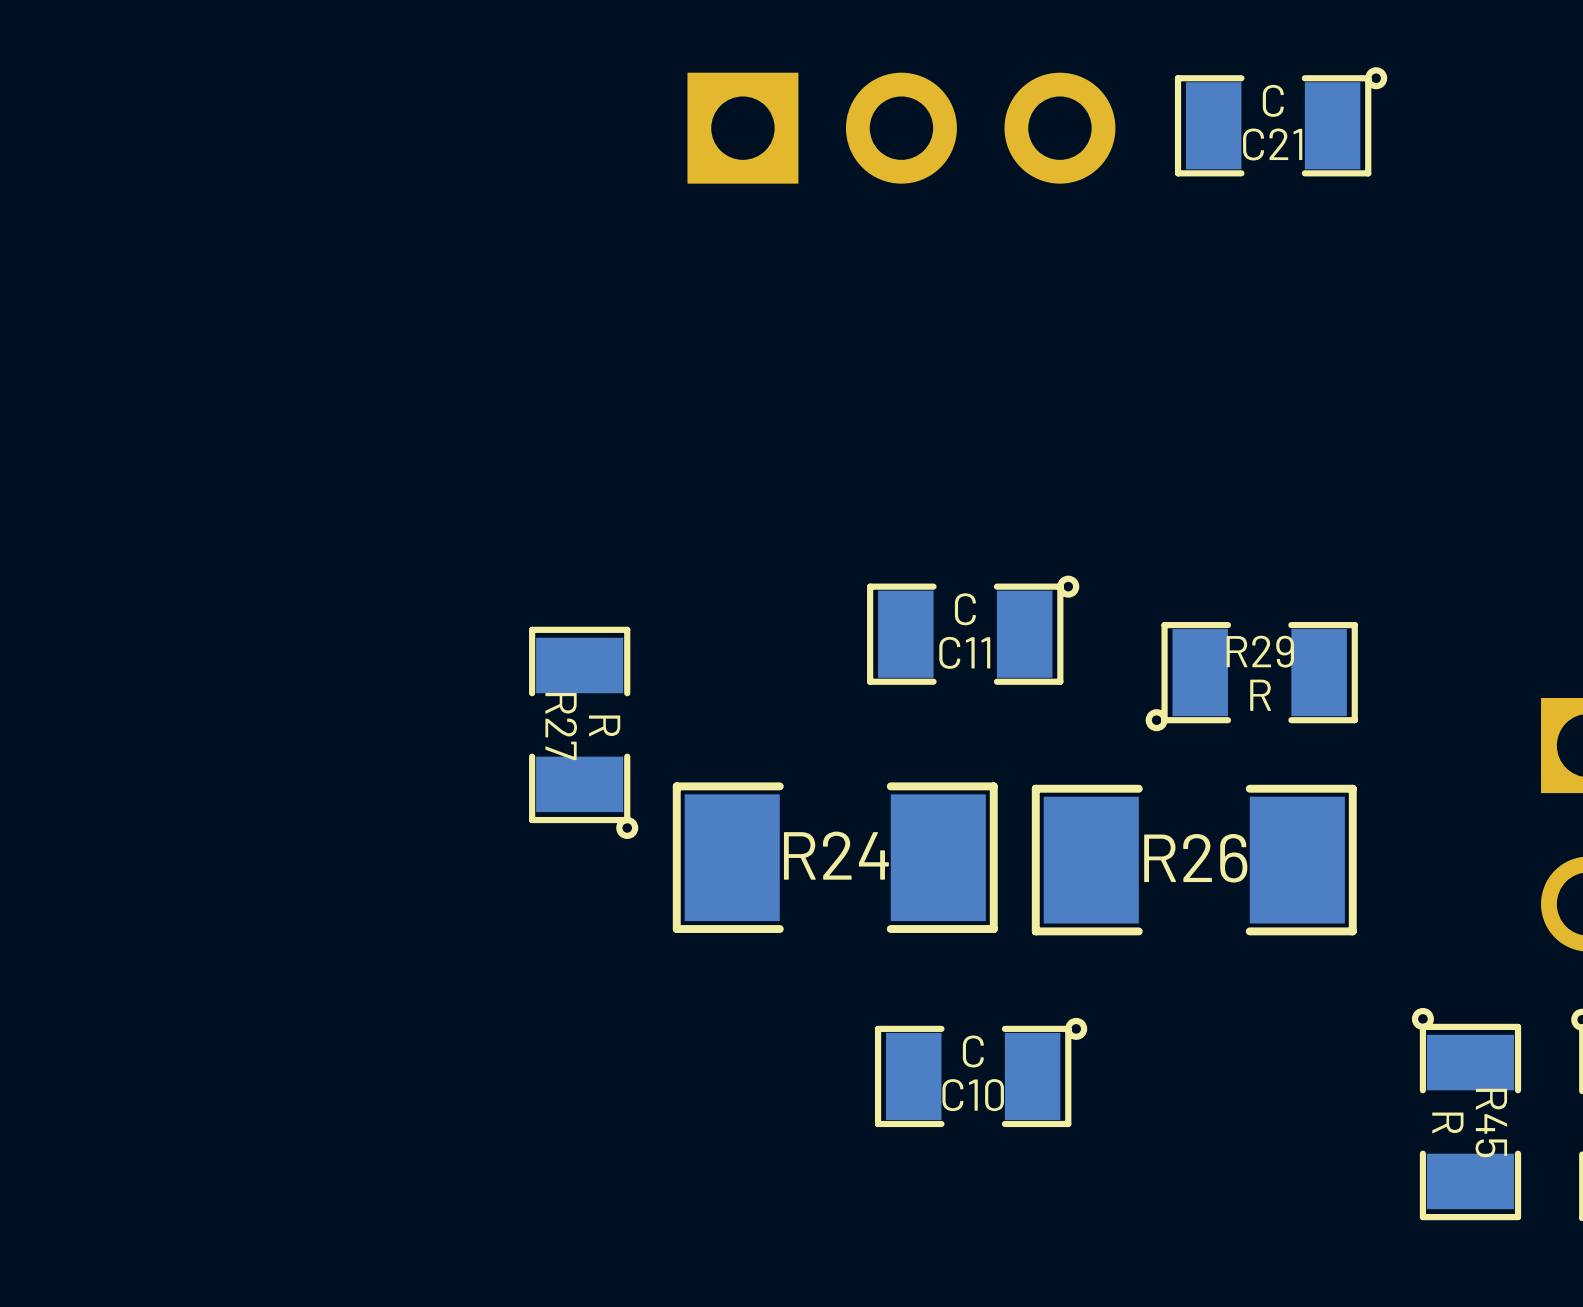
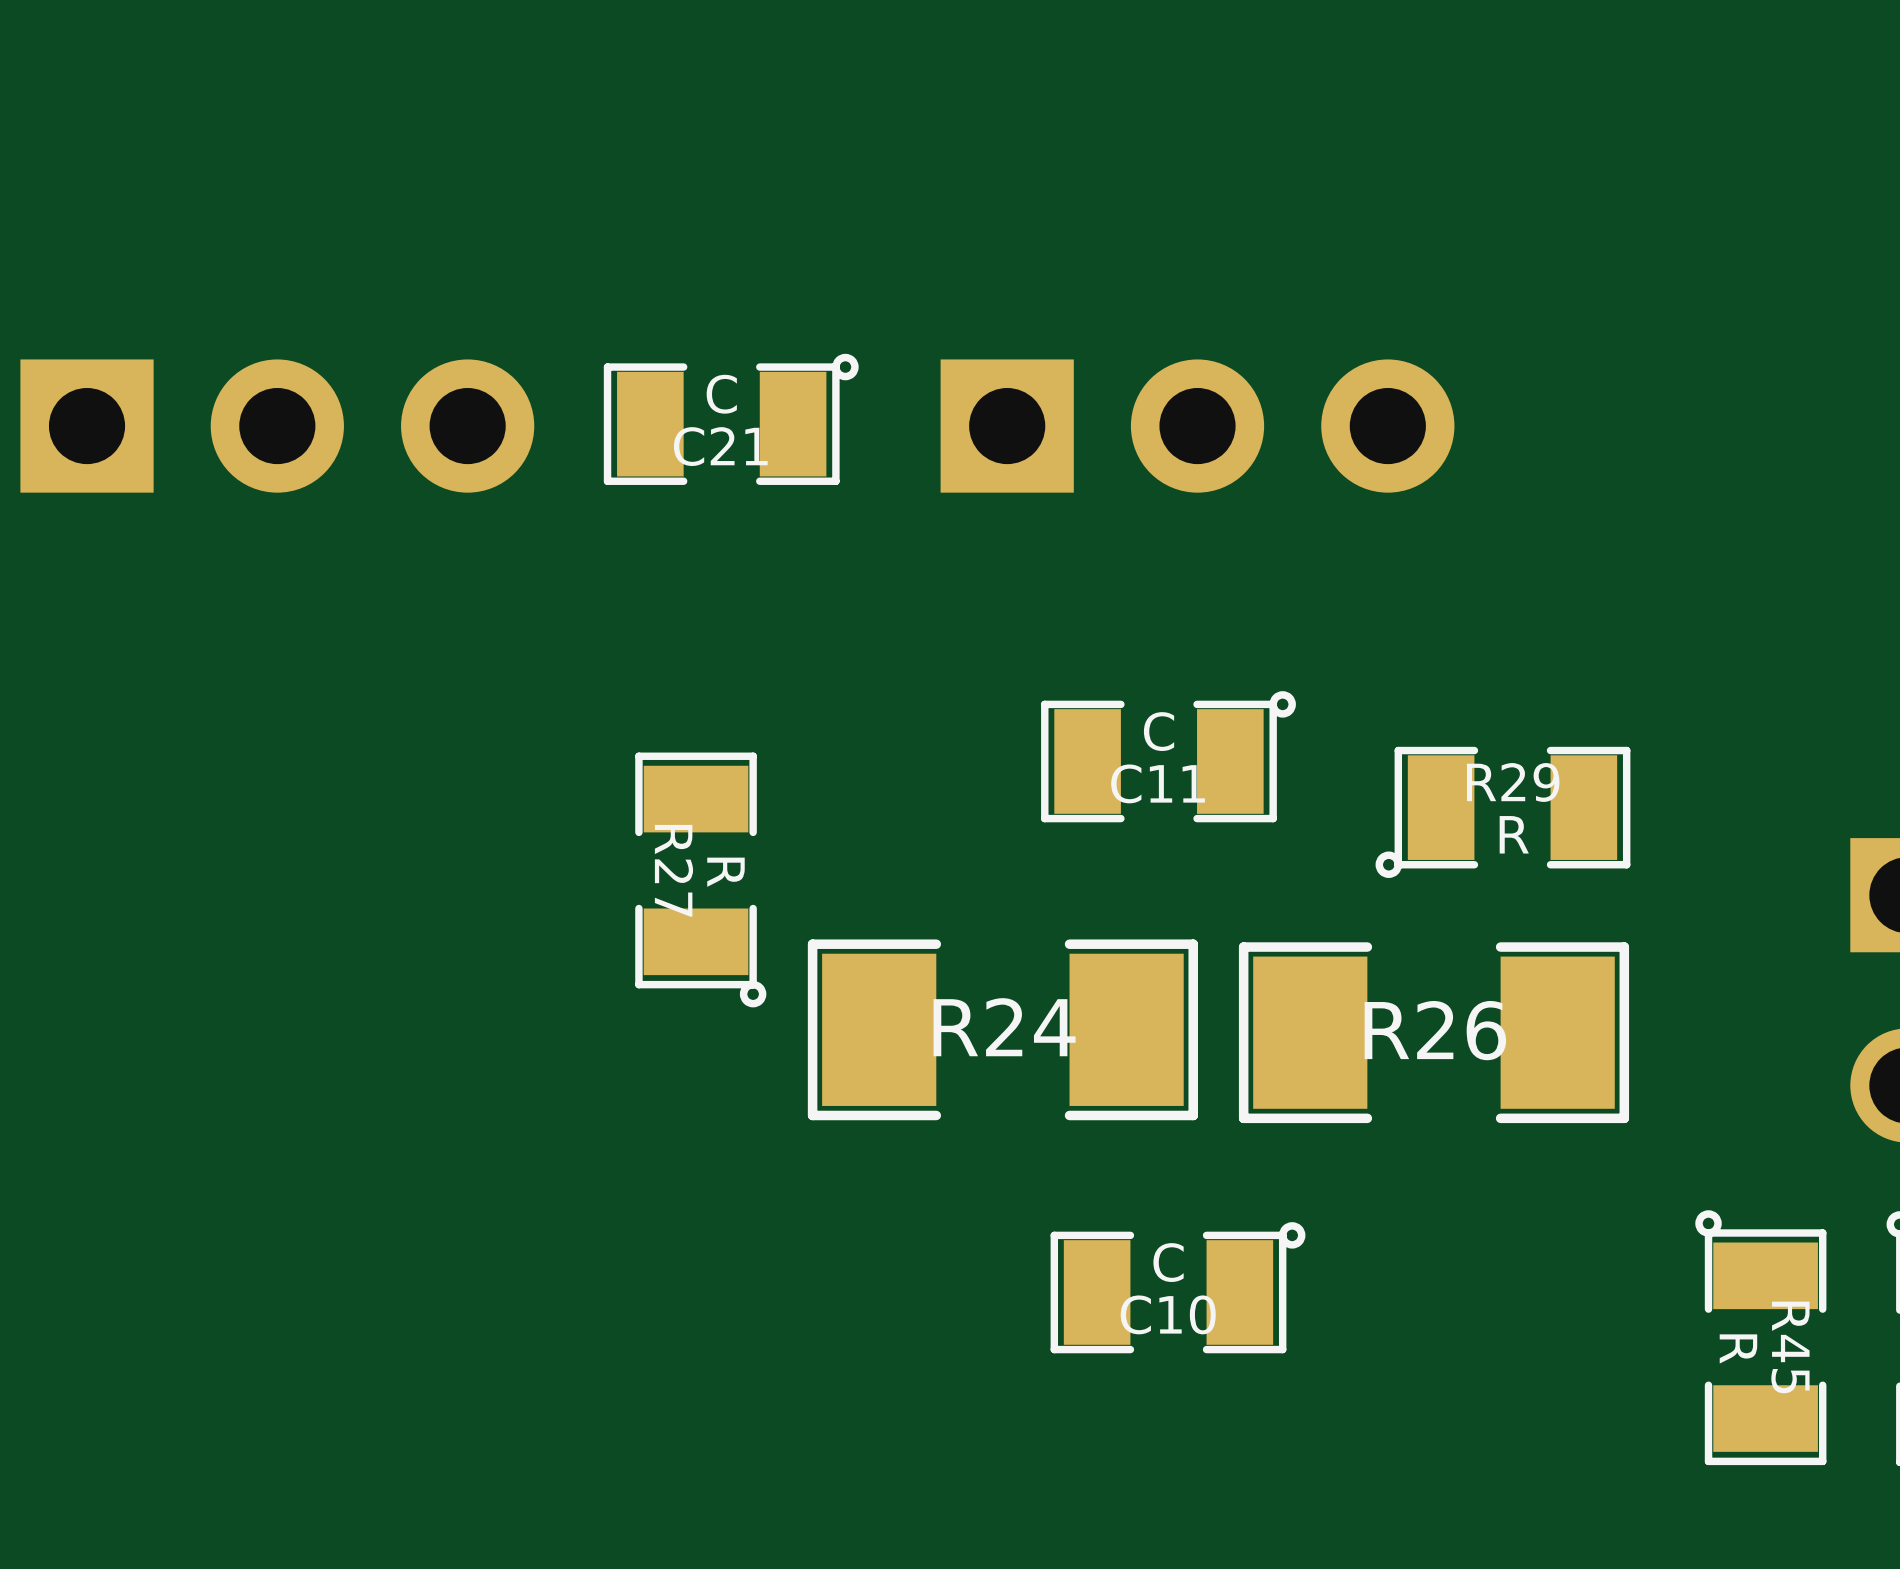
C21 position: (1281, 121) -> (731, 419)
part position: (901, 128) -> (1197, 426)
part: none -> (277, 426)

